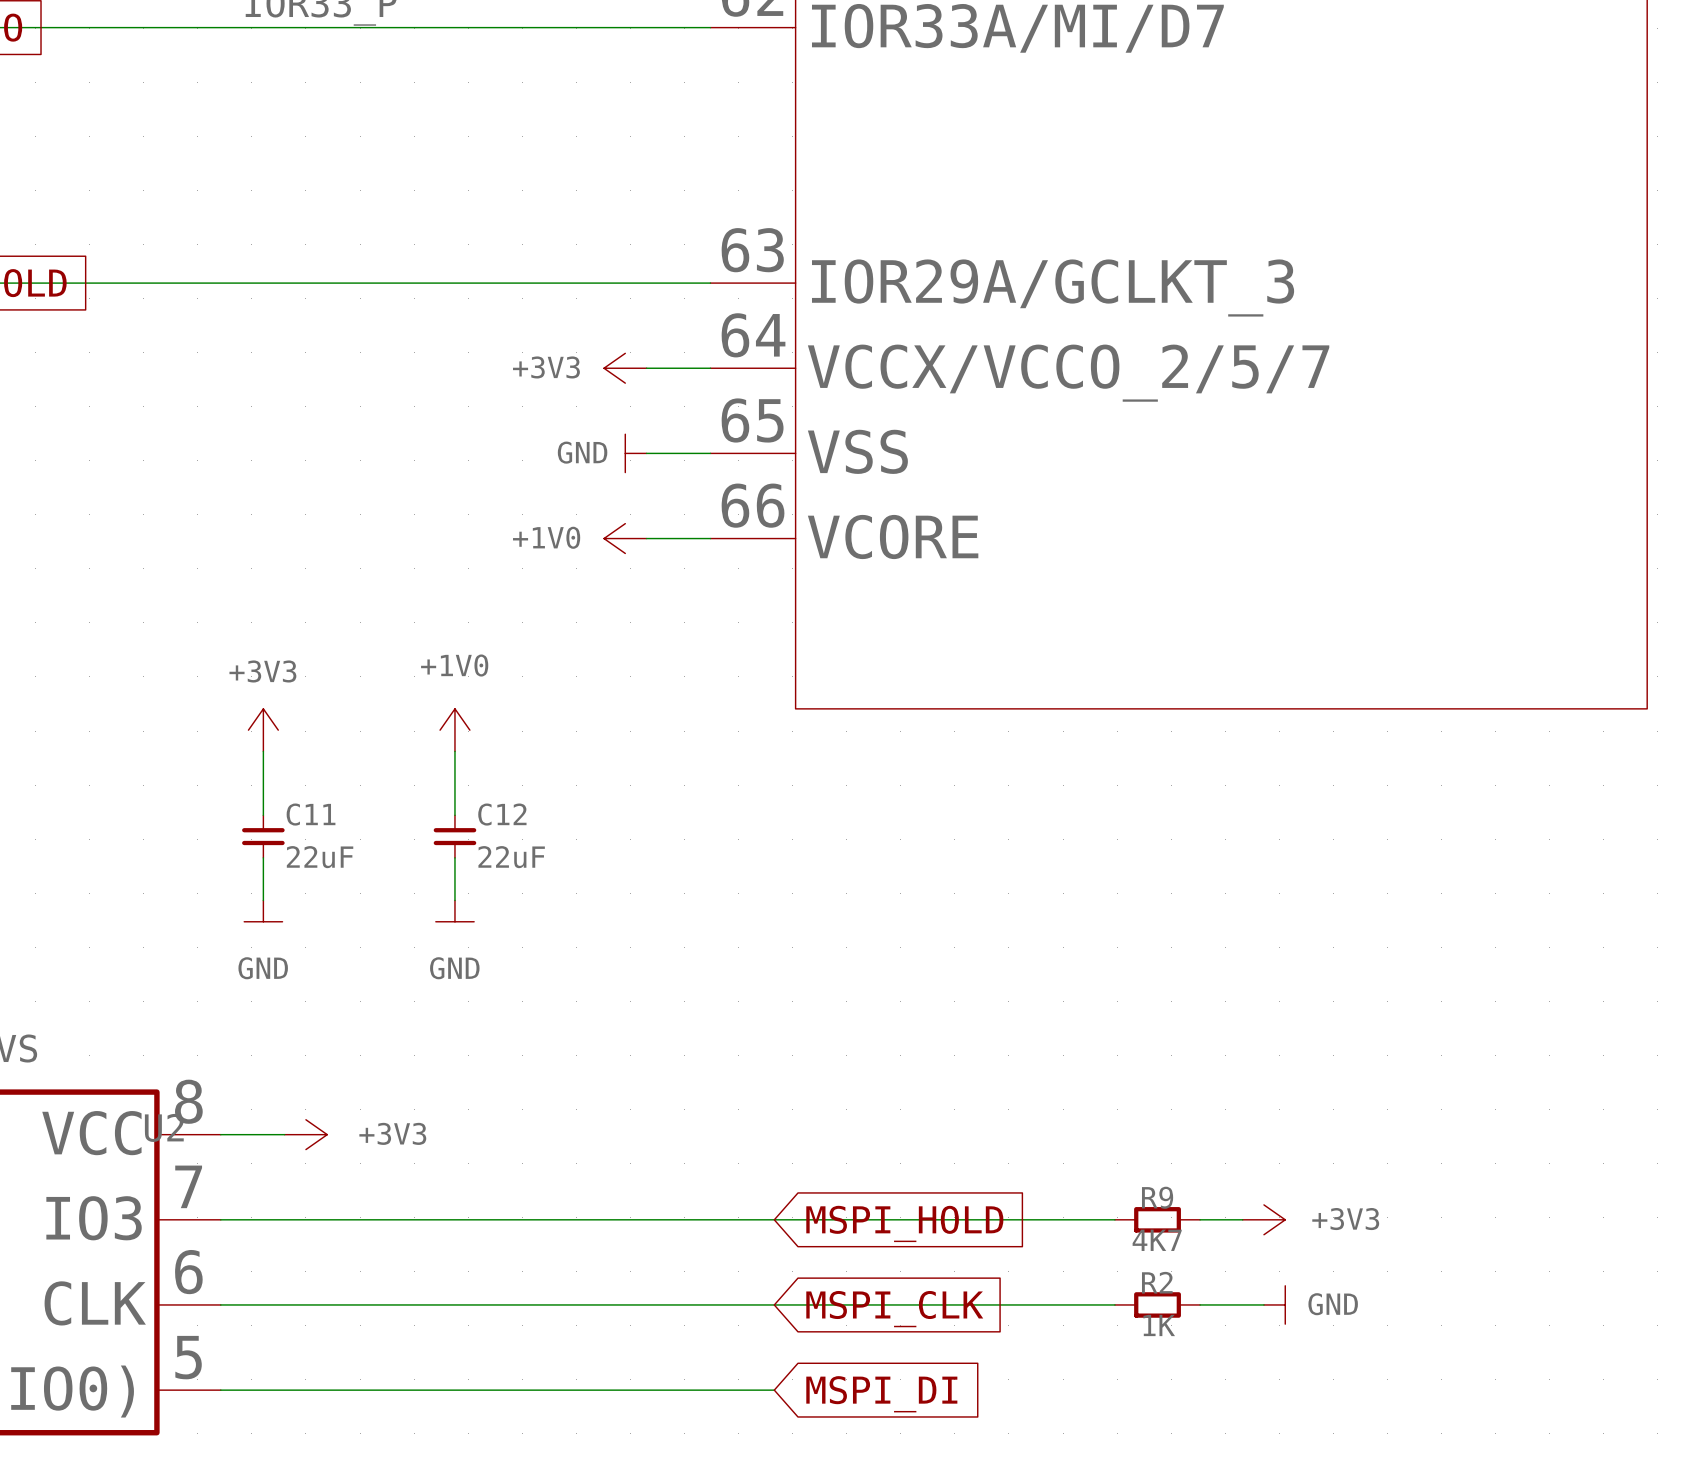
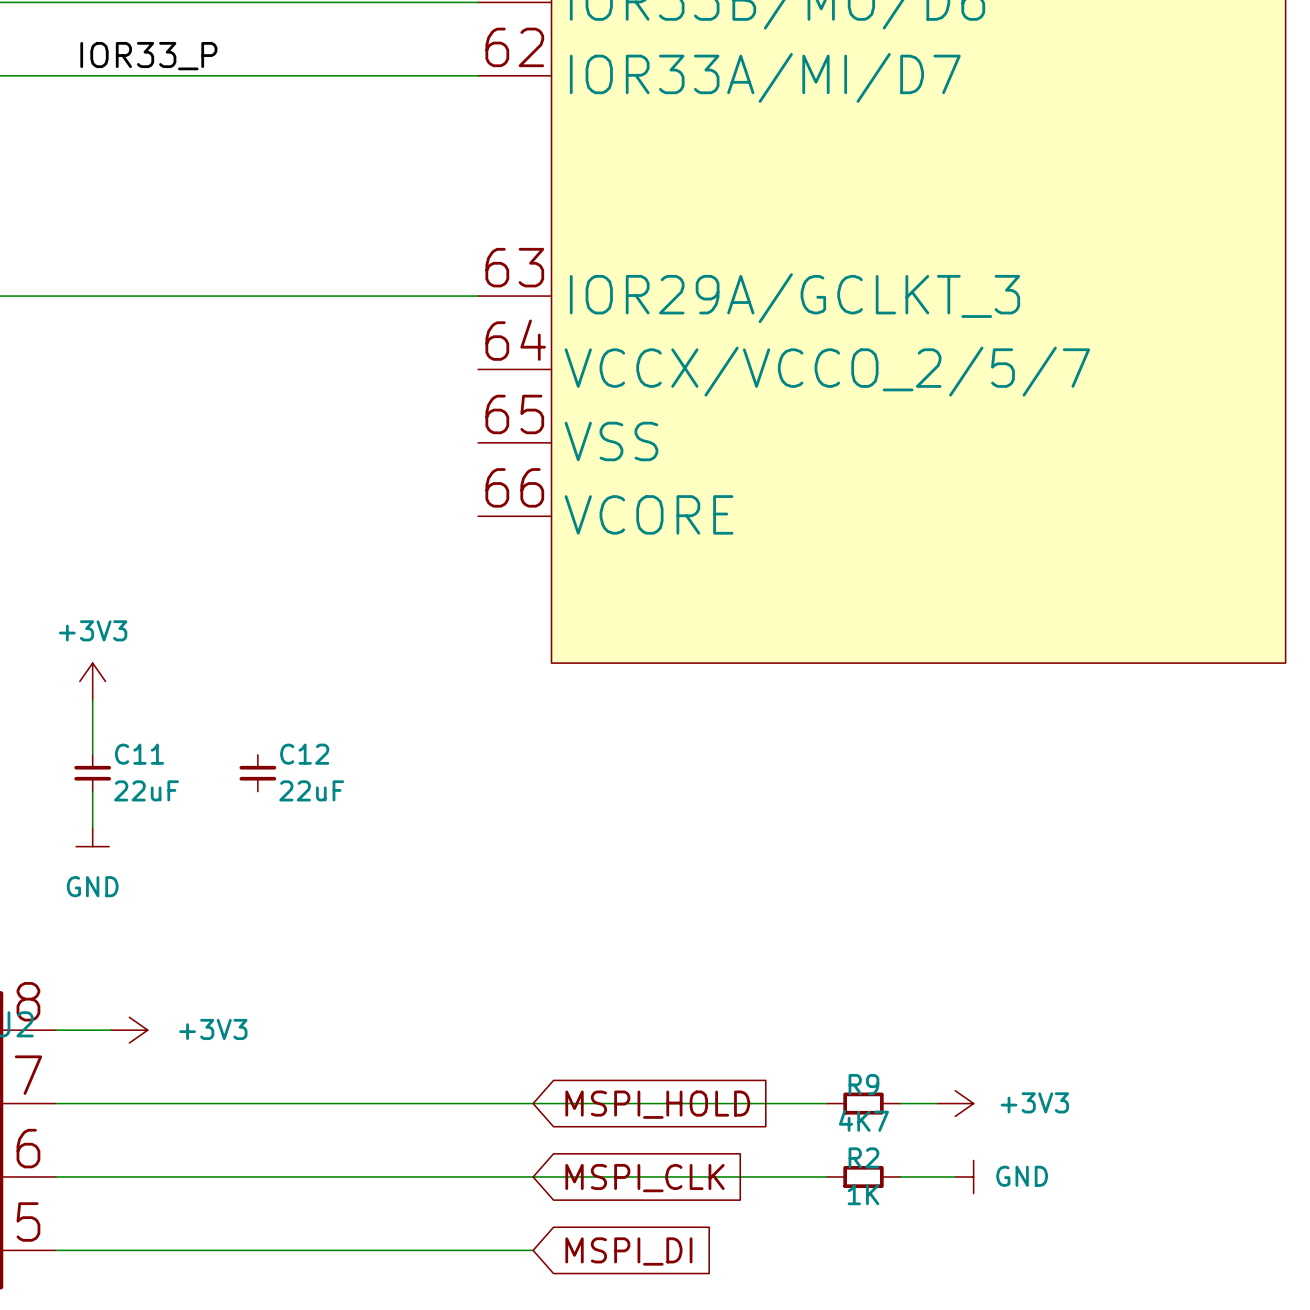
power symbol: +3V3 (625, 368) -> none
wire: (646, 368) (710, 368) -> none
power symbol: GND (635, 453) -> none
wire: (646, 453) (710, 453) -> none
power symbol: +1V0 (625, 538) -> none
wire: (646, 538) (710, 538) -> none
power symbol: +1V0 (454, 730) -> none
wire: (454, 751) (454, 815) -> none
wire: (454, 857) (454, 900) -> none
power symbol: GND (454, 911) -> none

